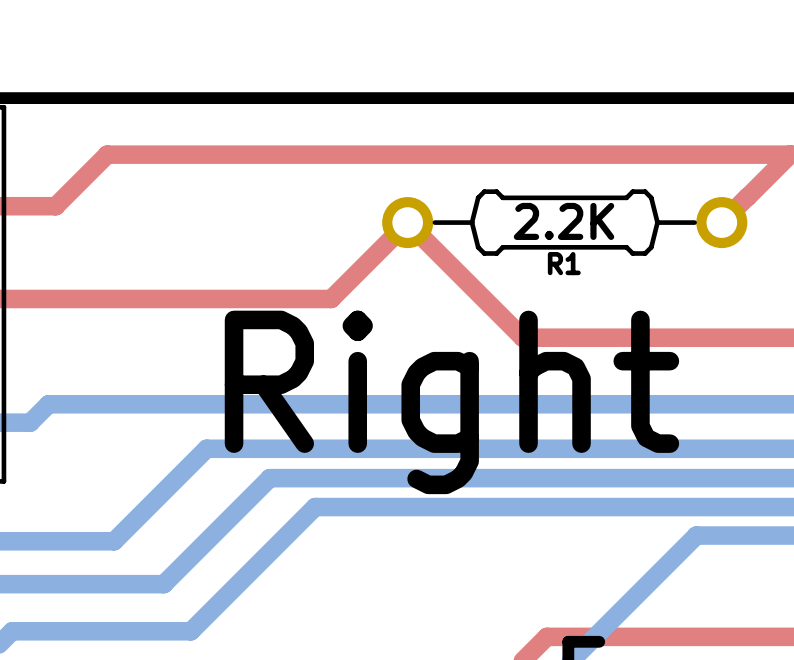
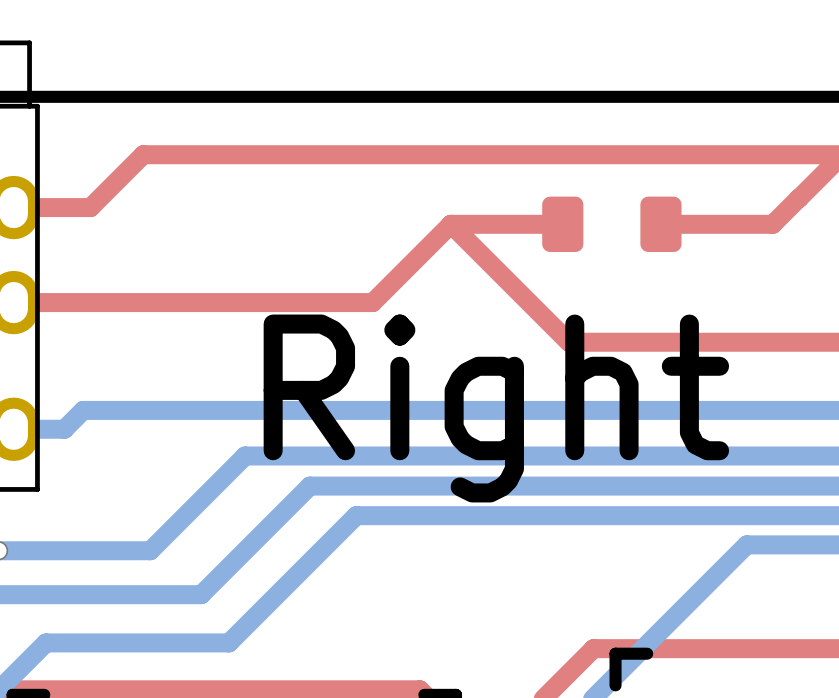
top track: none -> (562, 224) (450, 224)
R1: 2.2K (564, 222) -> none
part: none -> (611, 224)
top track: none -> (772, 224) (660, 224)

